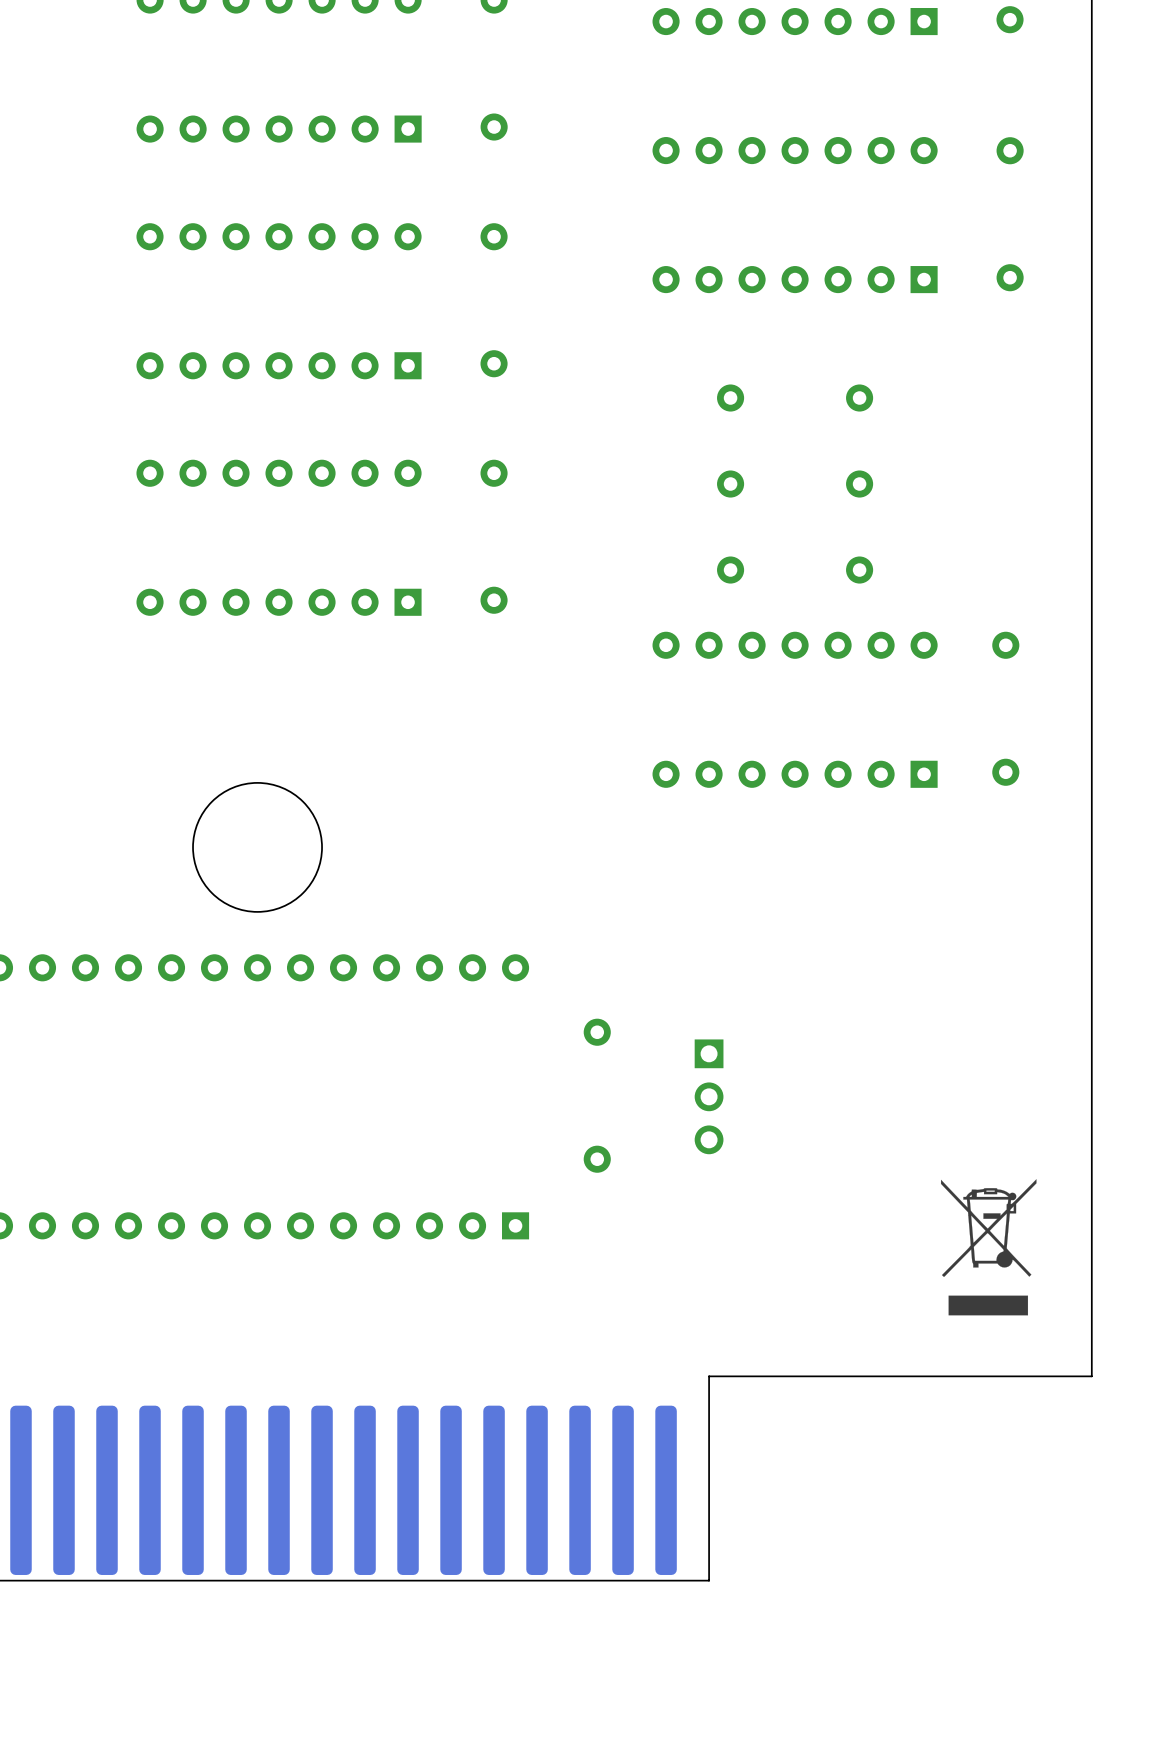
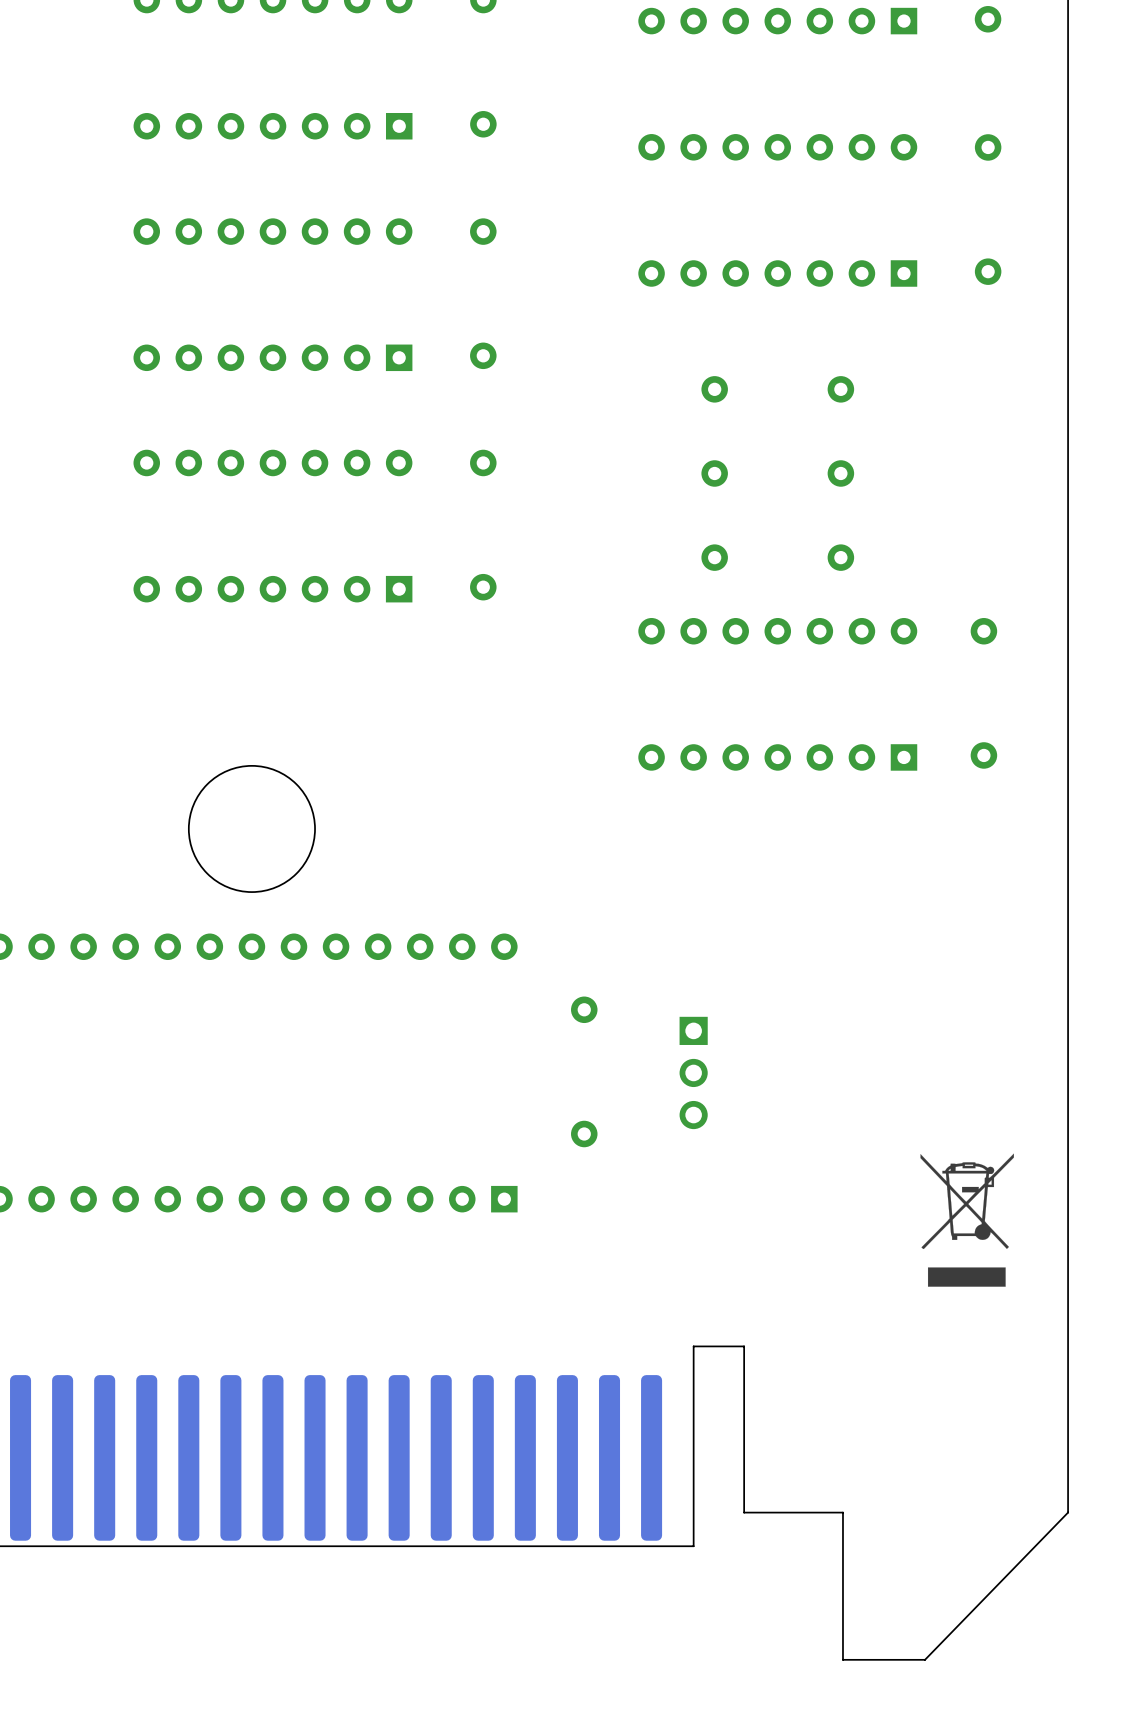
board edge: (1091, 1376) (760, 1376) -> (1068, 1346) (1068, 1512) (925, 1659) (842, 1659) (842, 1512) (744, 1512) (744, 1346)

